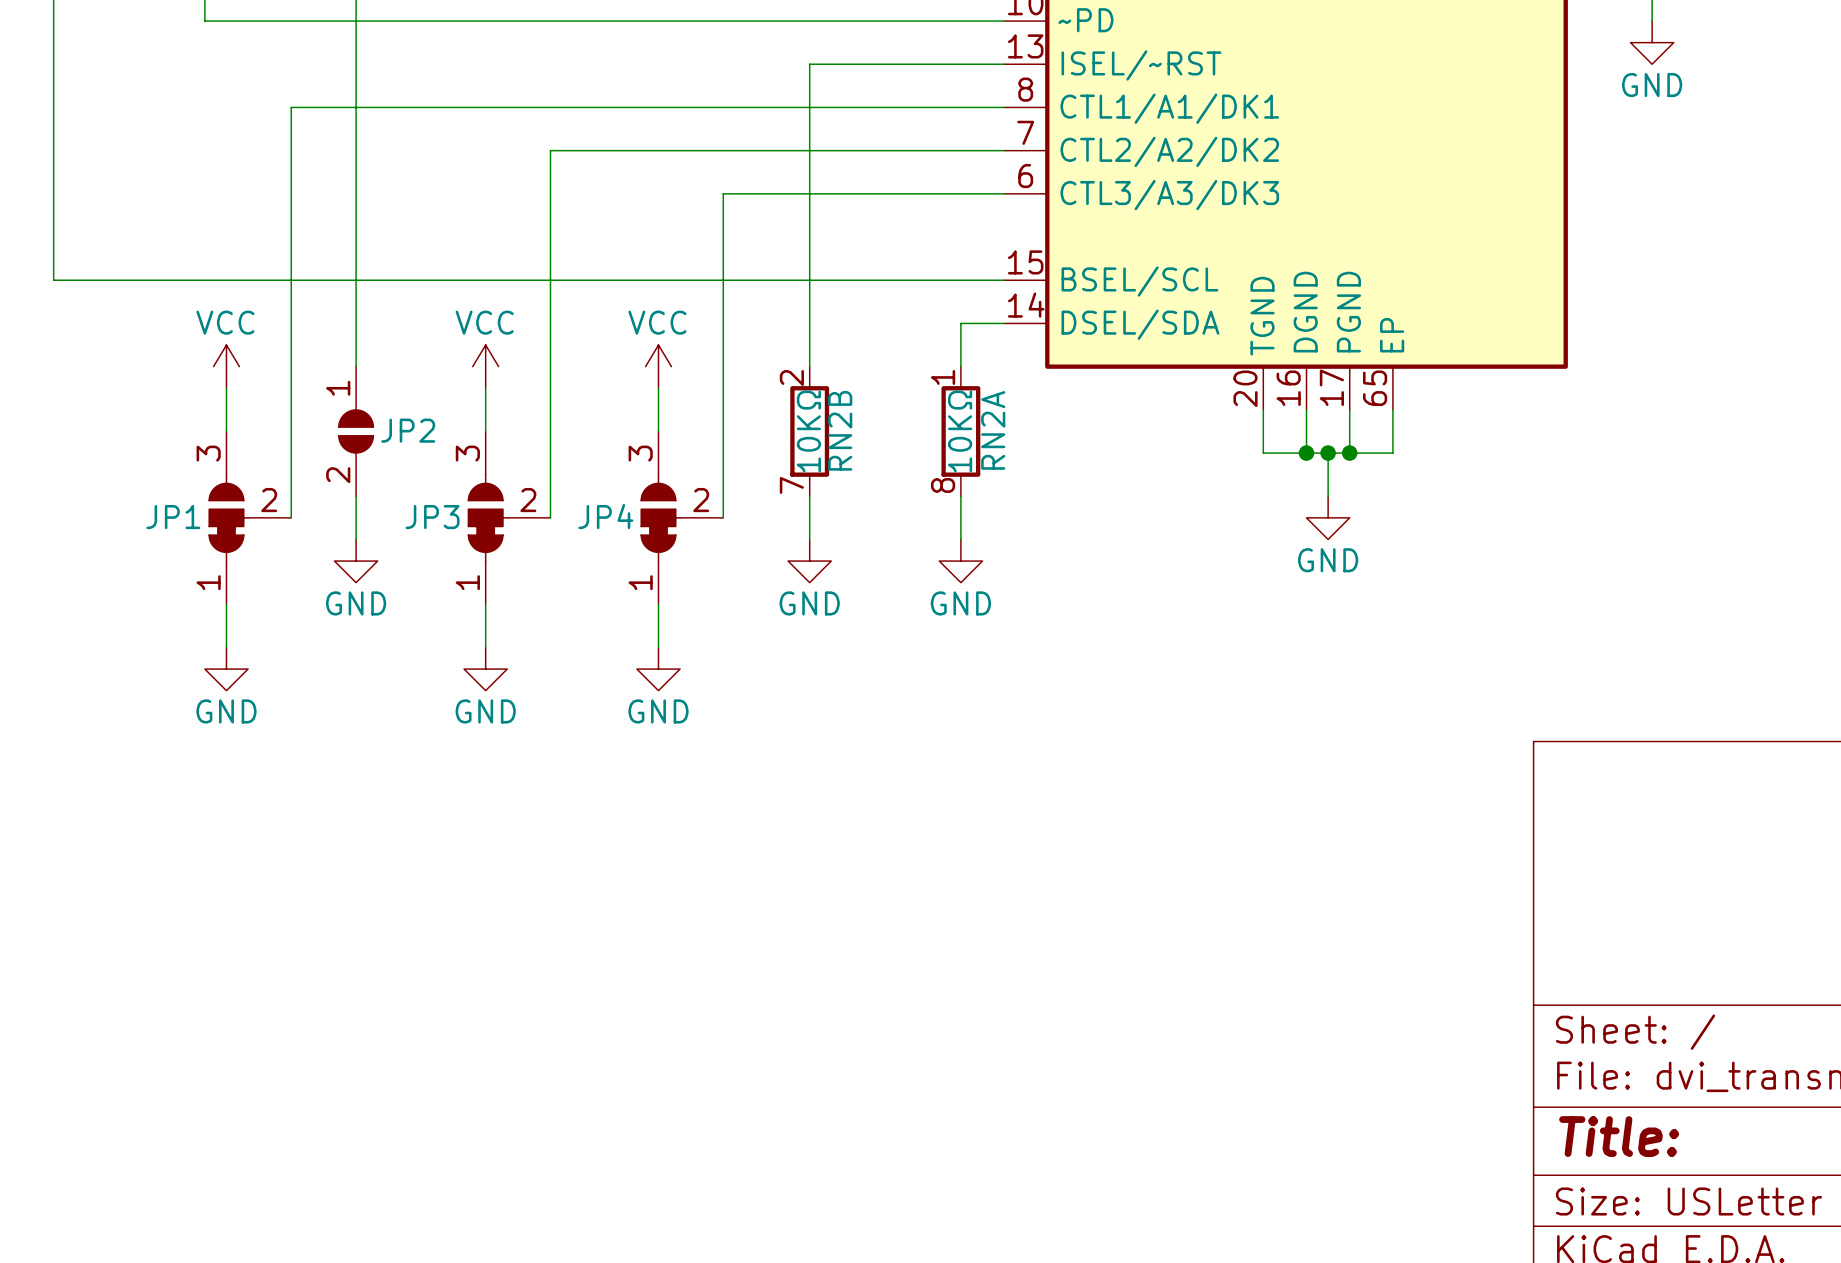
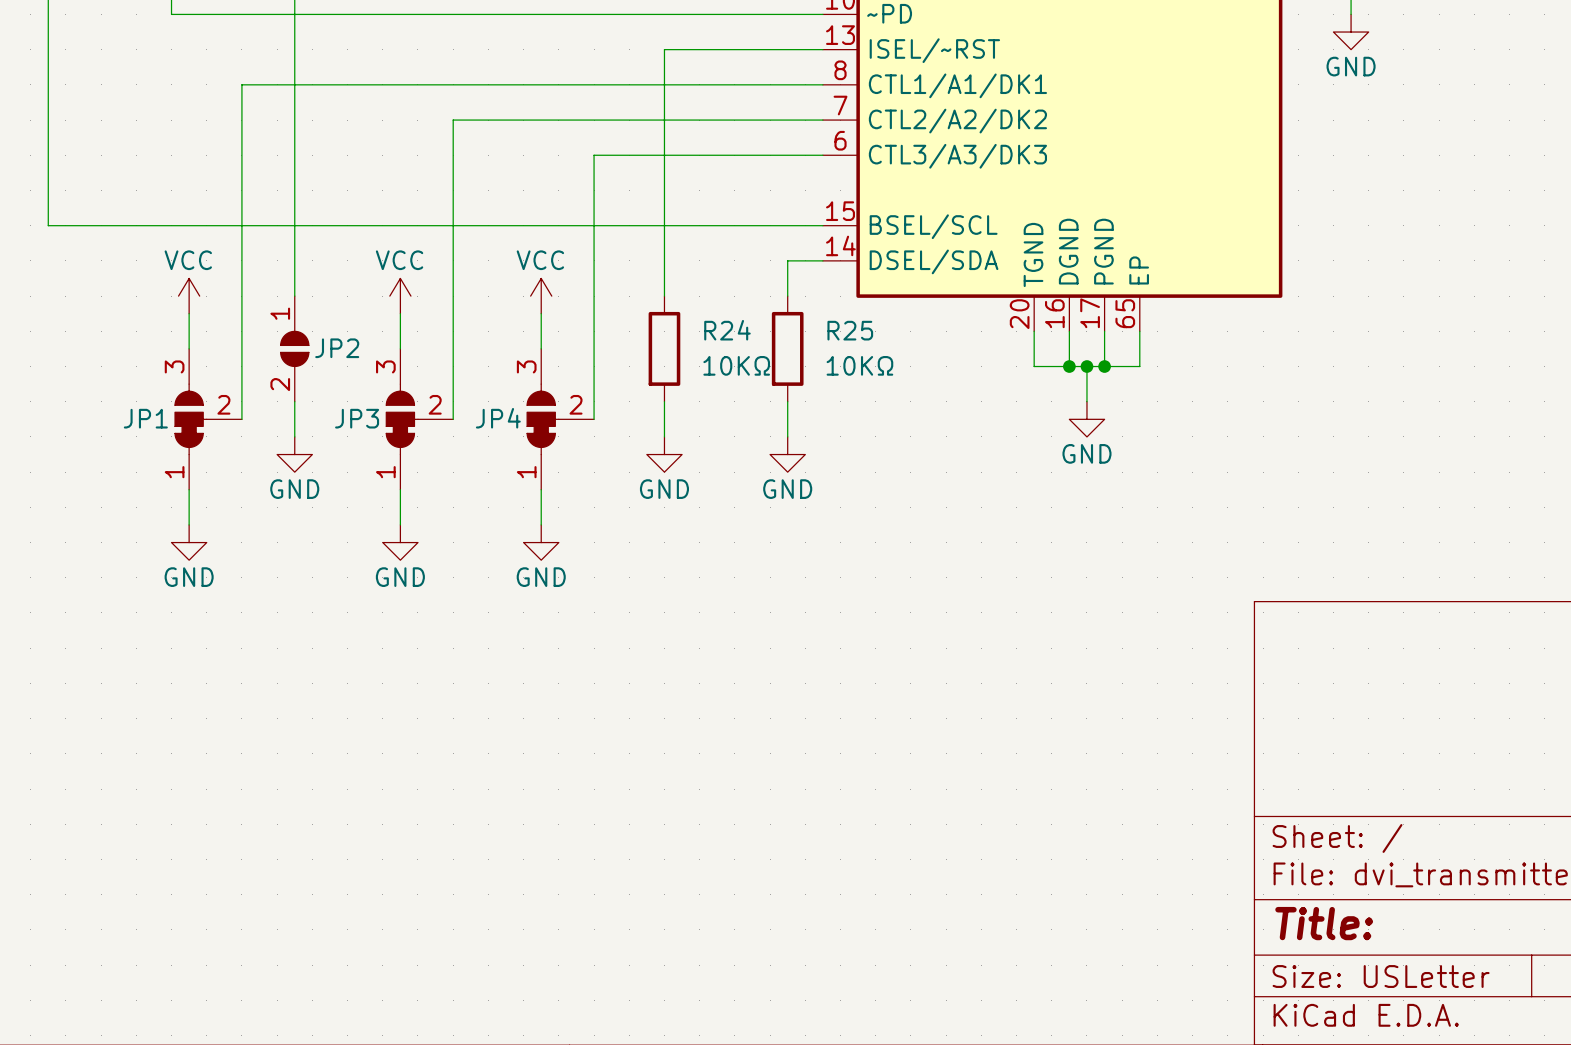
RN2B pin number: 2 (791, 377) -> none
RN2A pin number: 1 (943, 377) -> none
RN2B name: RN2B (840, 430) -> R24 (727, 330)
RN2A name: RN2A (993, 430) -> R25 (850, 330)
RN2B value rotation: 0° (808, 431) -> 90° clockwise (736, 365)
RN2A value rotation: 0° (960, 431) -> 90° clockwise (859, 365)
RN2B pin number: 7 (791, 485) -> none
RN2A pin number: 8 (943, 485) -> none

